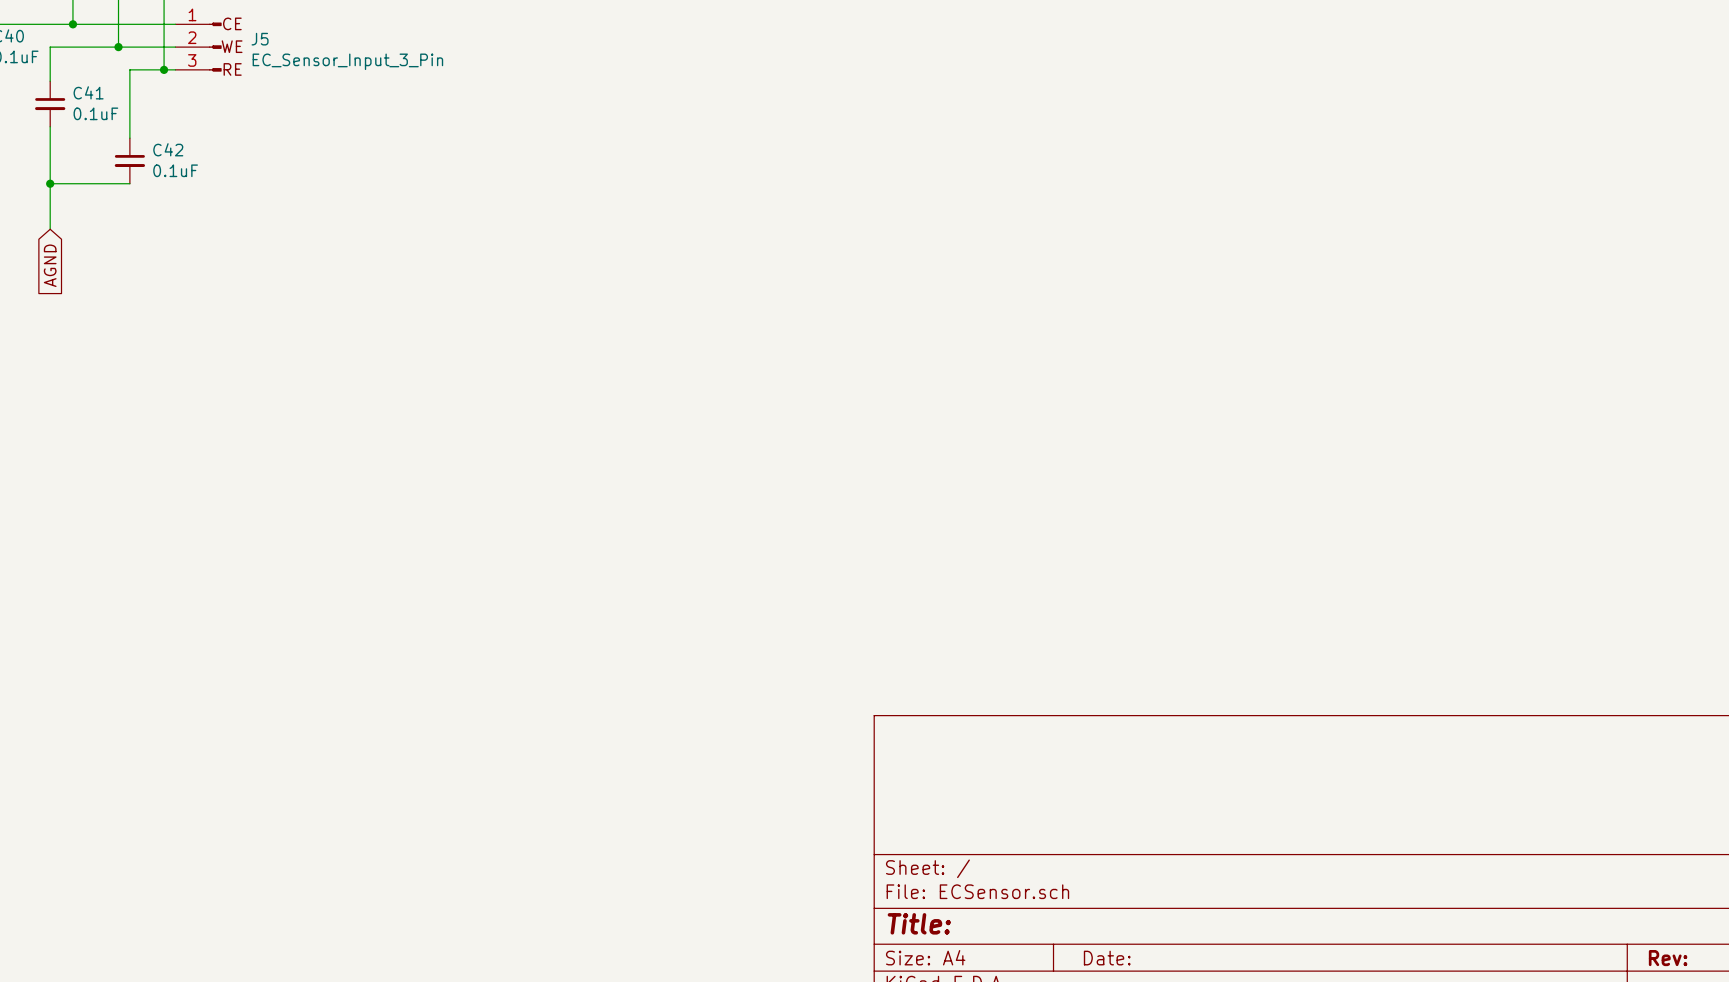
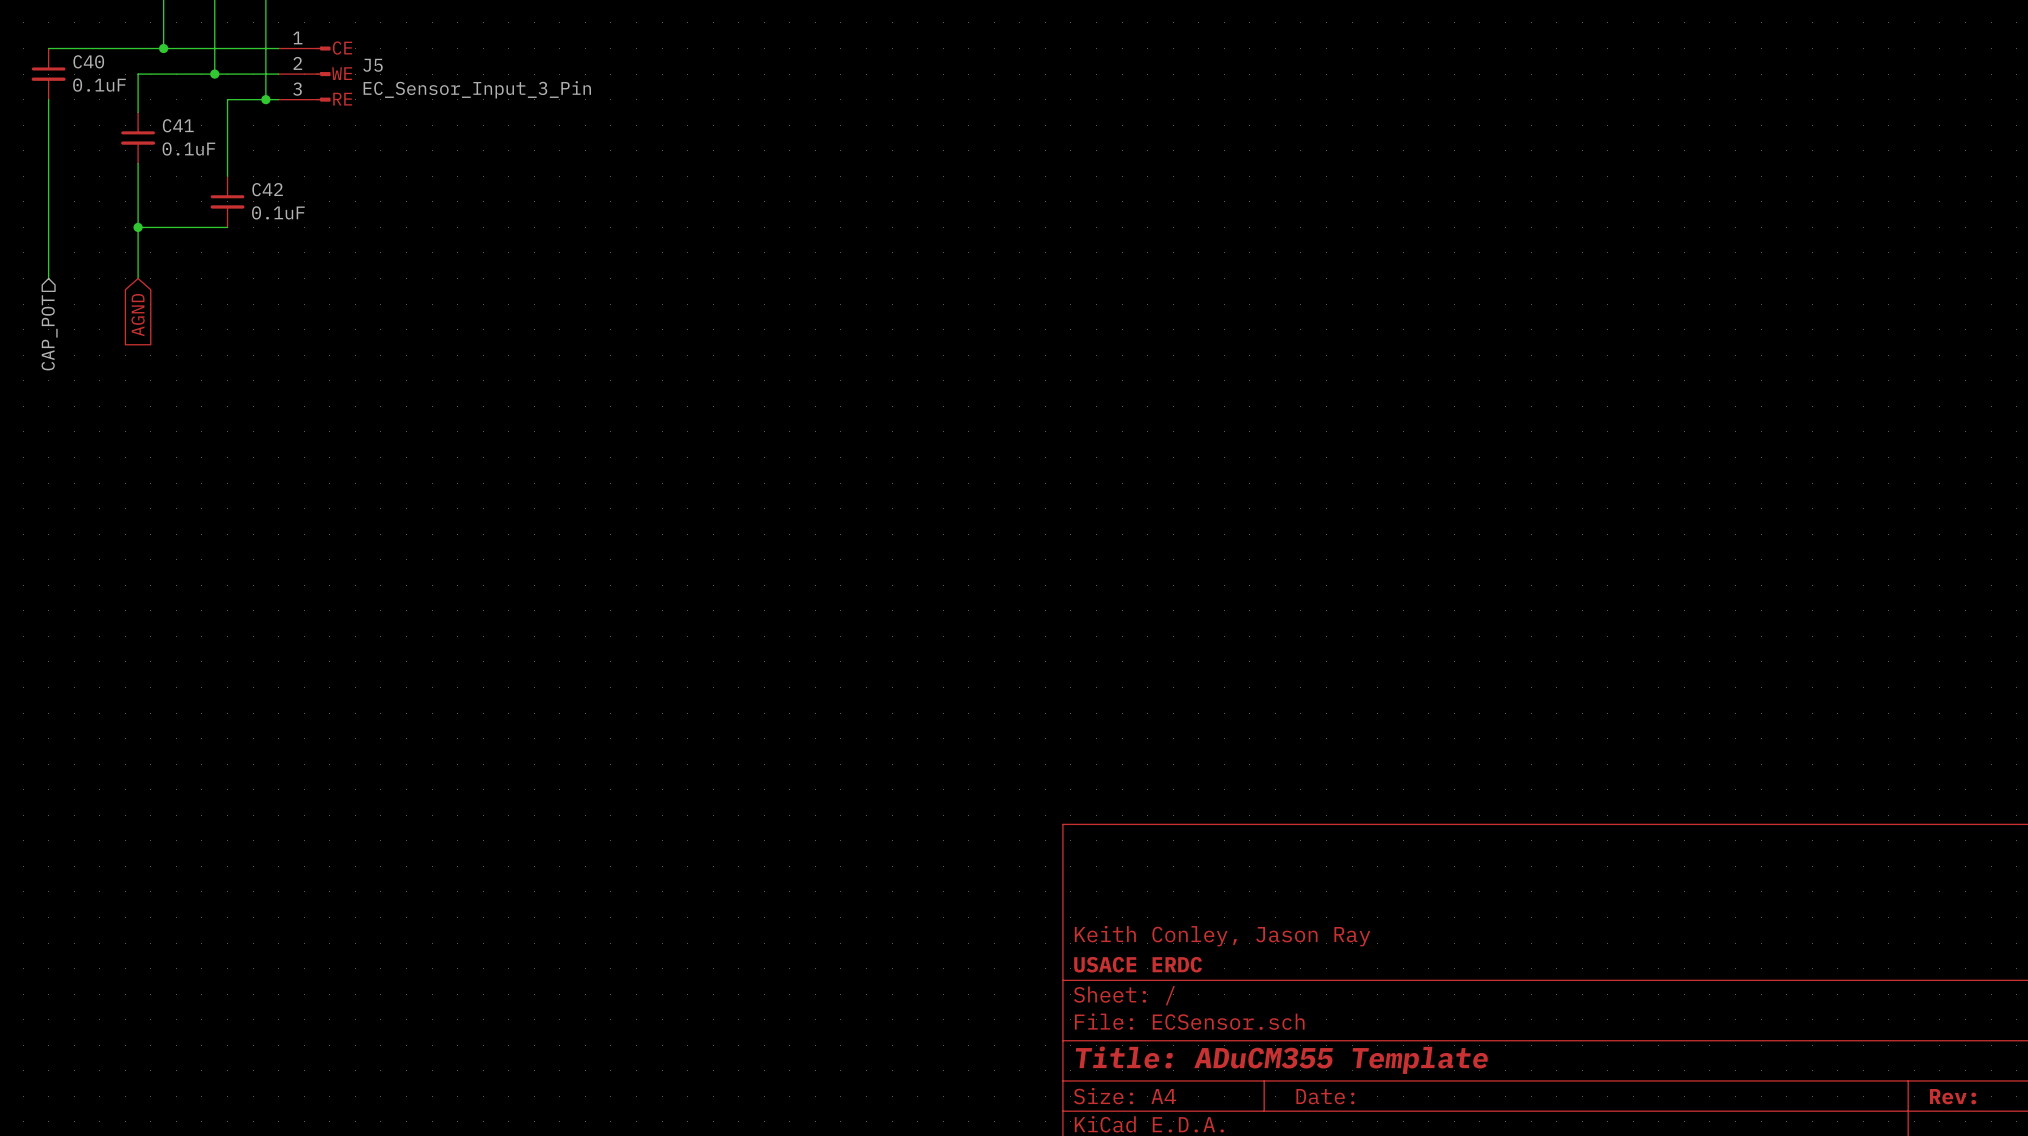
title block: none -> Keith Conley, Jason Ray (1222, 936)
title block: none -> USACE ERDC (1138, 964)
title block: Title: (919, 923) -> Title: ADuCM355 Template (1281, 1060)

